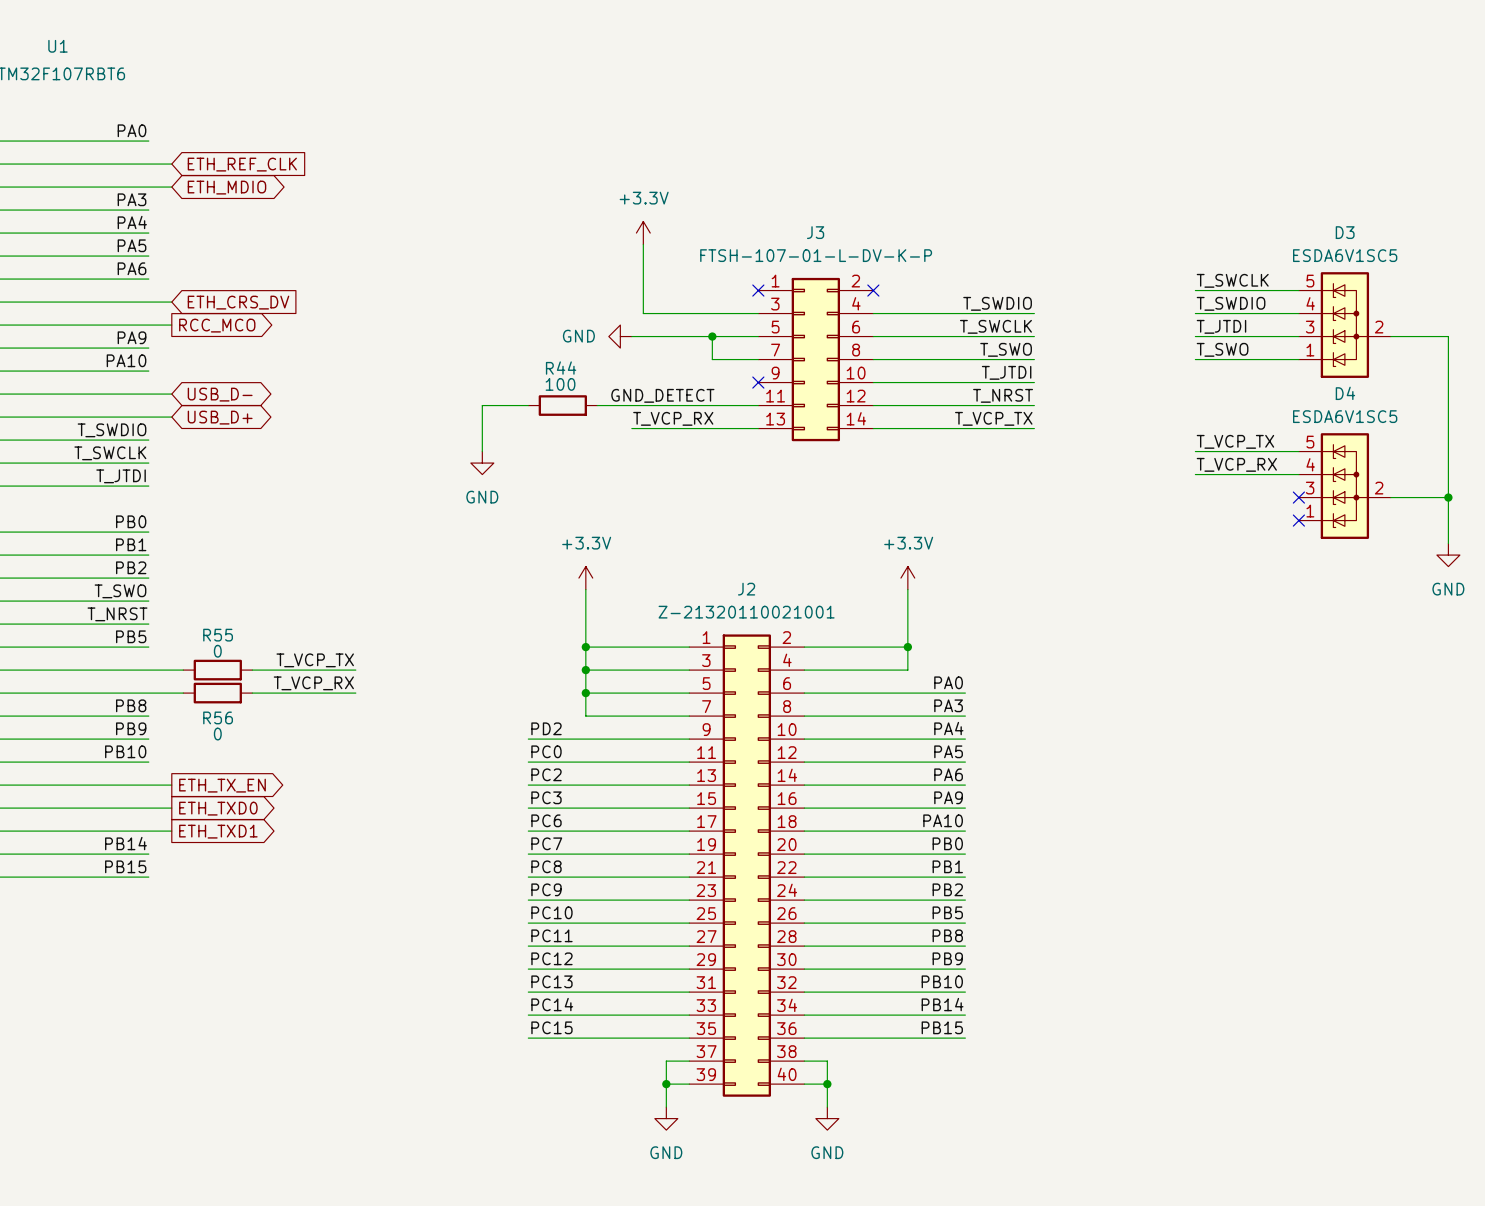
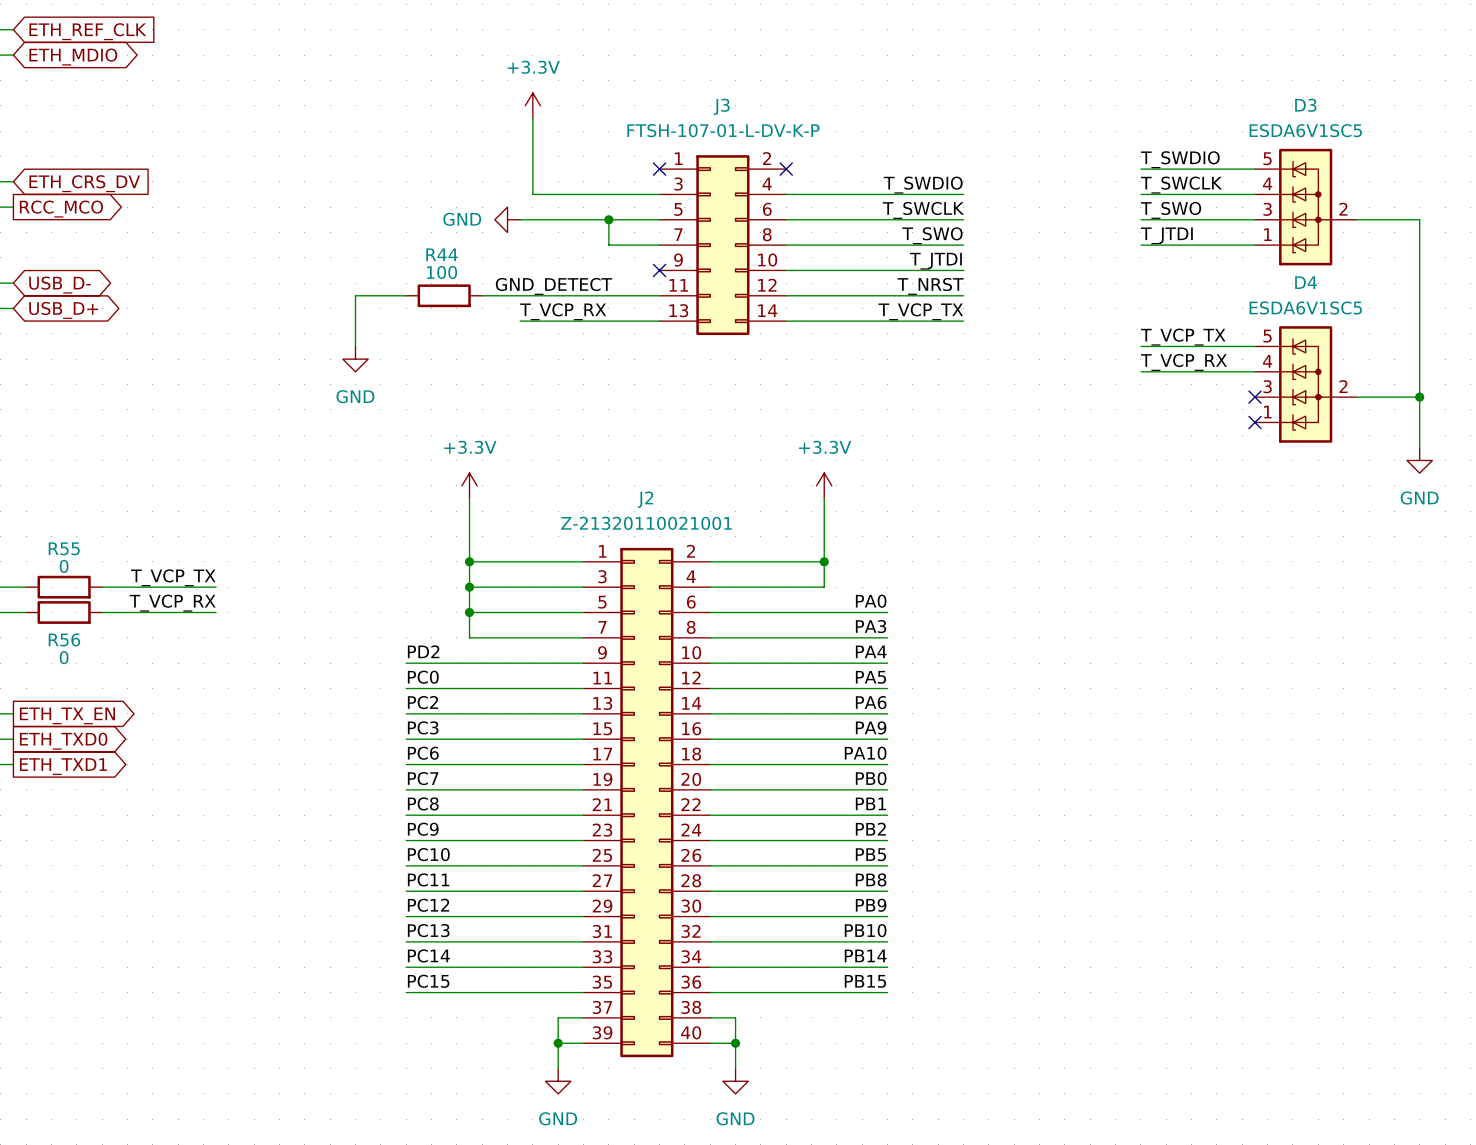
label: T_SWCLK (1232, 280) -> T_SWDIO (1180, 159)
label: T_SWDIO (1231, 303) -> T_SWCLK (1181, 185)
label: T_JTDI (1221, 326) -> T_SWO (1171, 210)
label: T_SWO (1222, 349) -> T_JTDI (1166, 235)

